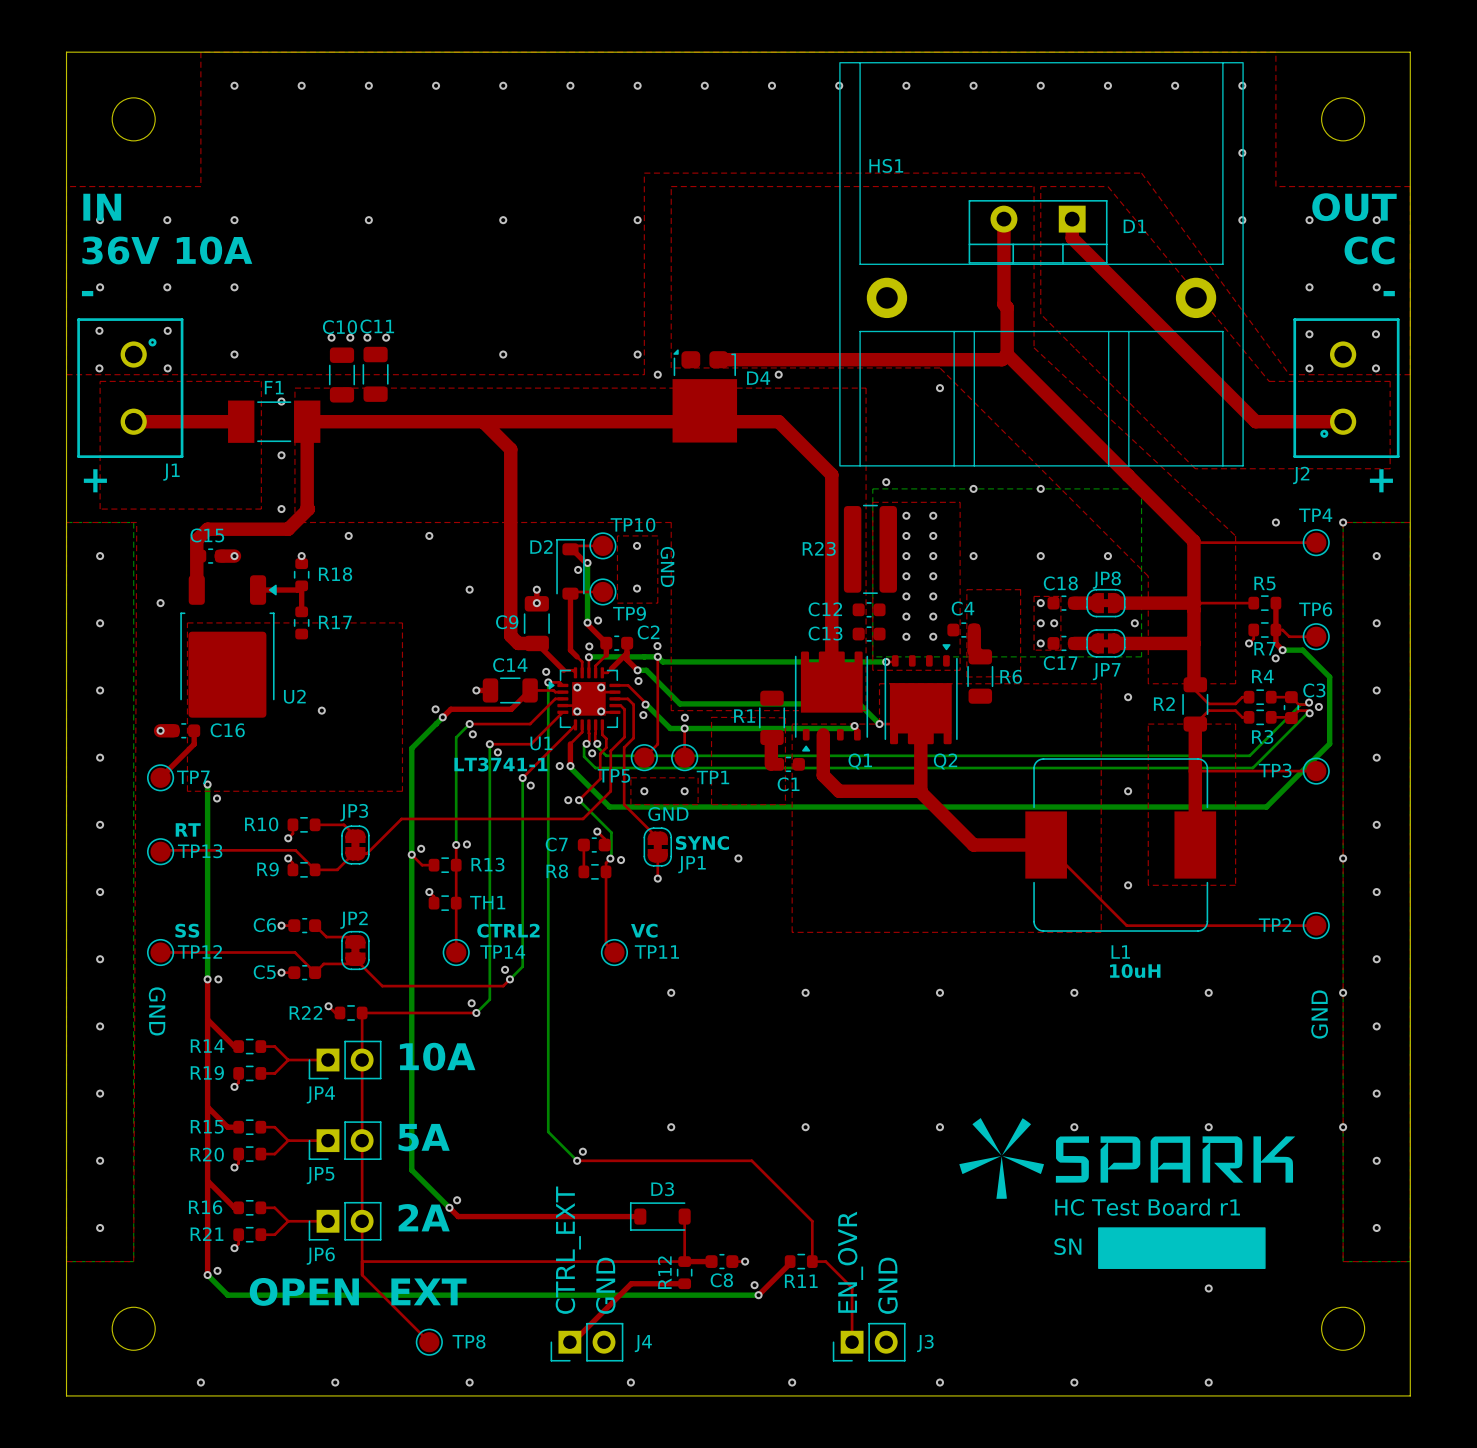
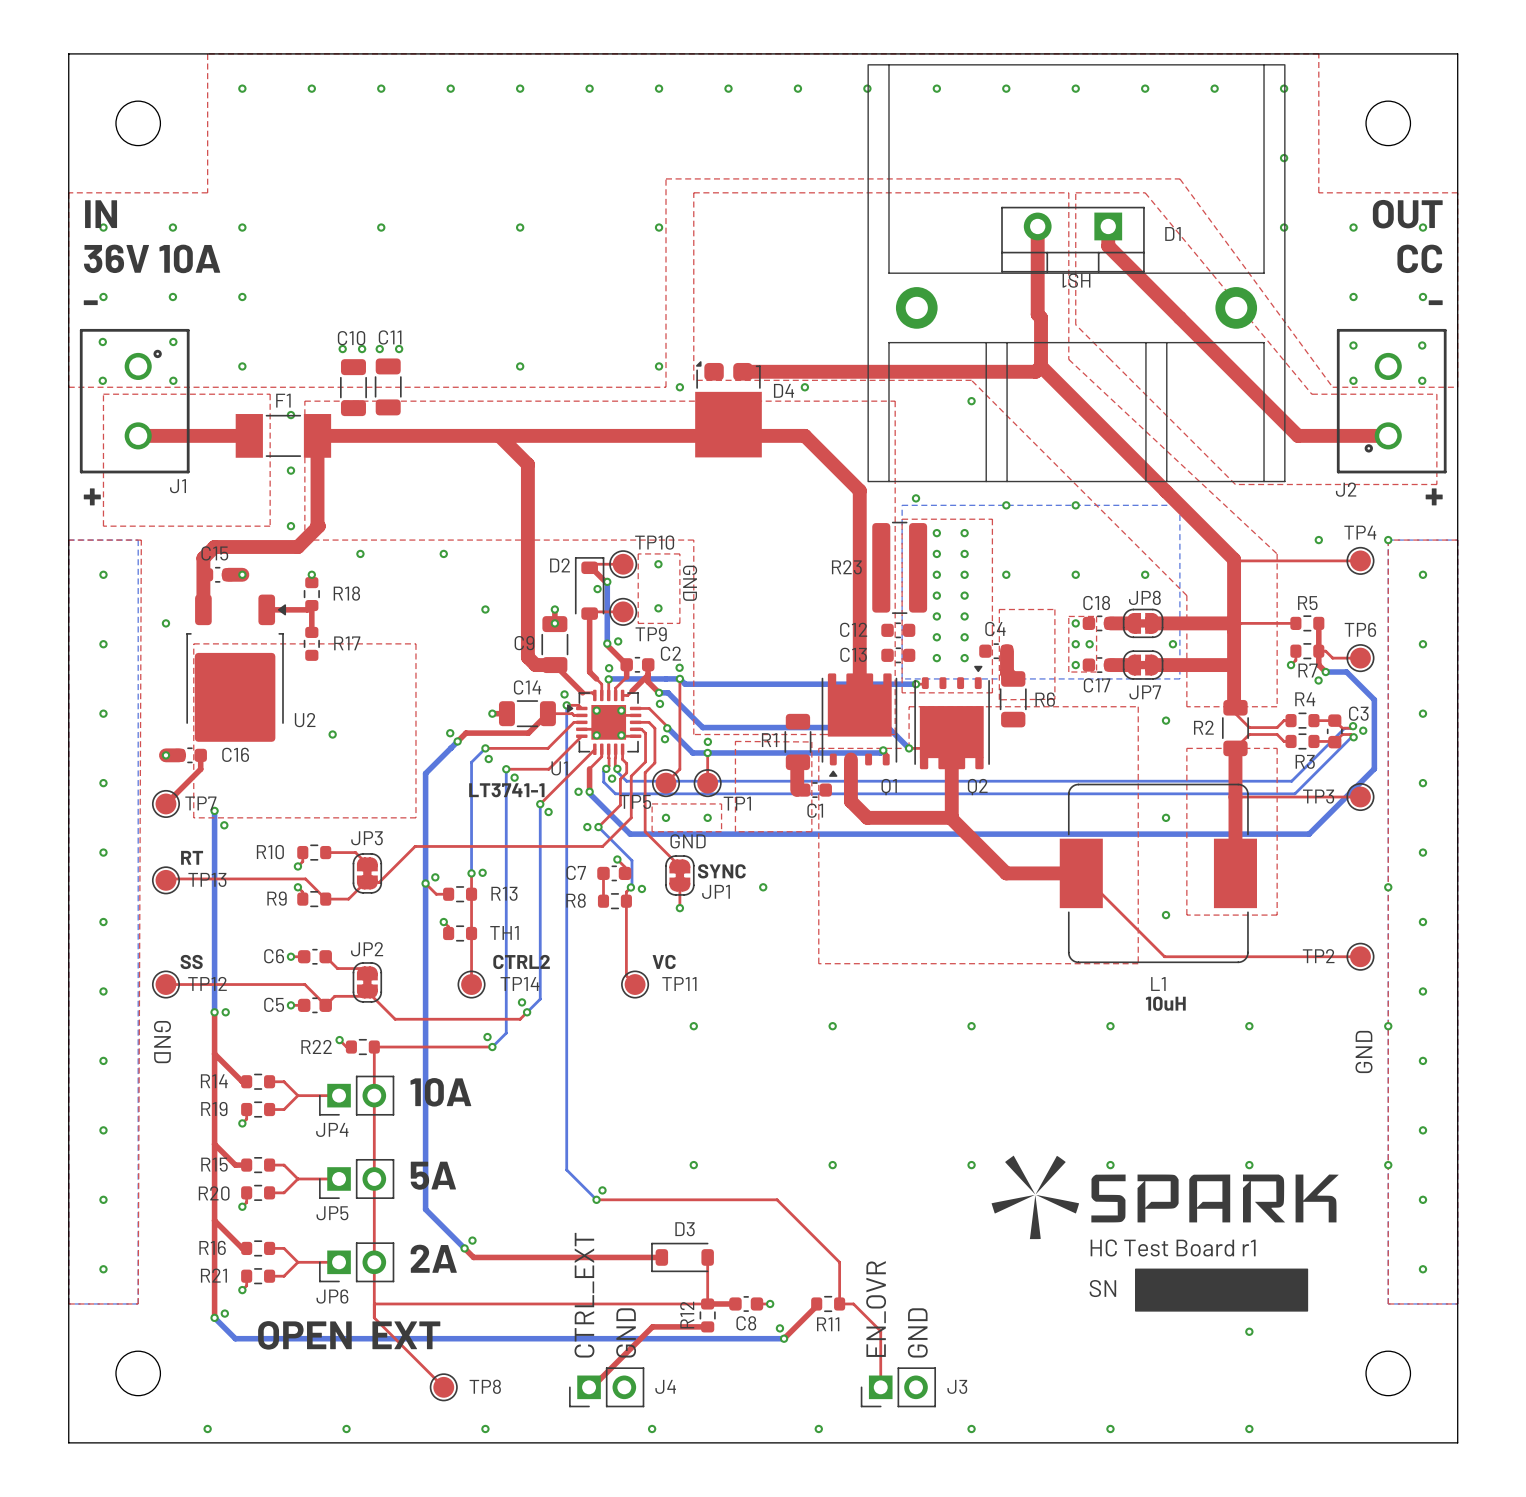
HS1 name rotation: 0° (886, 165) -> 180° (1076, 280)
HS1 name position: HS1 (886, 165) -> HS1 (1076, 280)

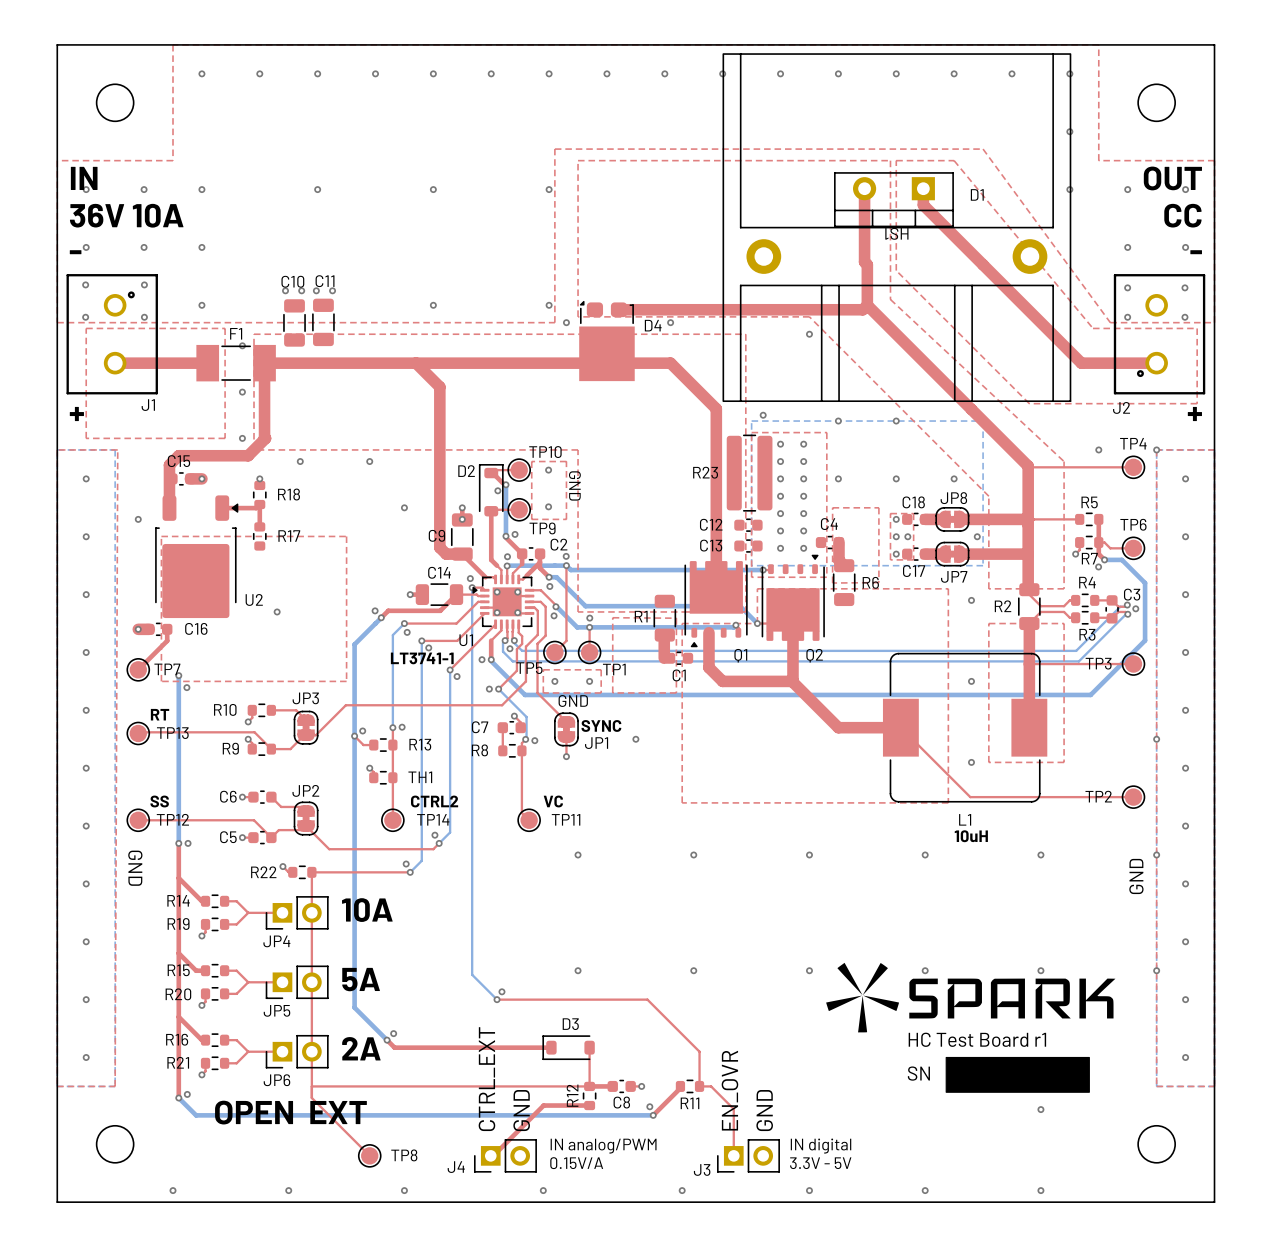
text: none -> IN analog/PWM (603, 1146)
text: none -> IN digital (821, 1146)
J4 name position: J4 (665, 1386) -> J4 (456, 1167)
J3 name position: J3 (957, 1386) -> J3 (702, 1169)
text: none -> 0.15V/A (576, 1163)
text: none -> 3.3V - 5V (820, 1163)

